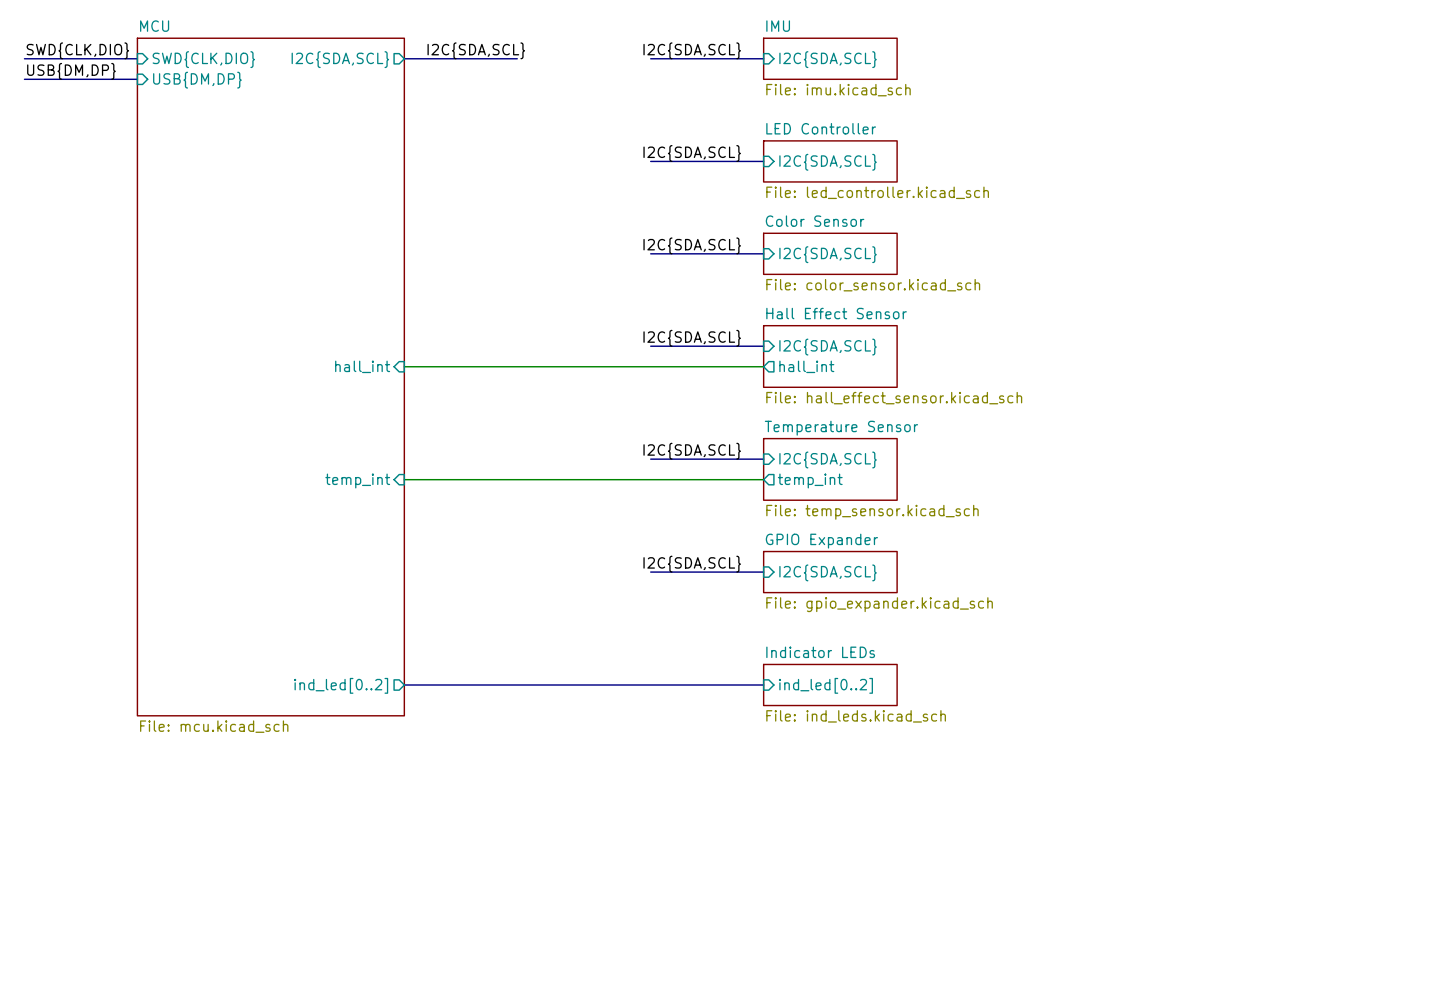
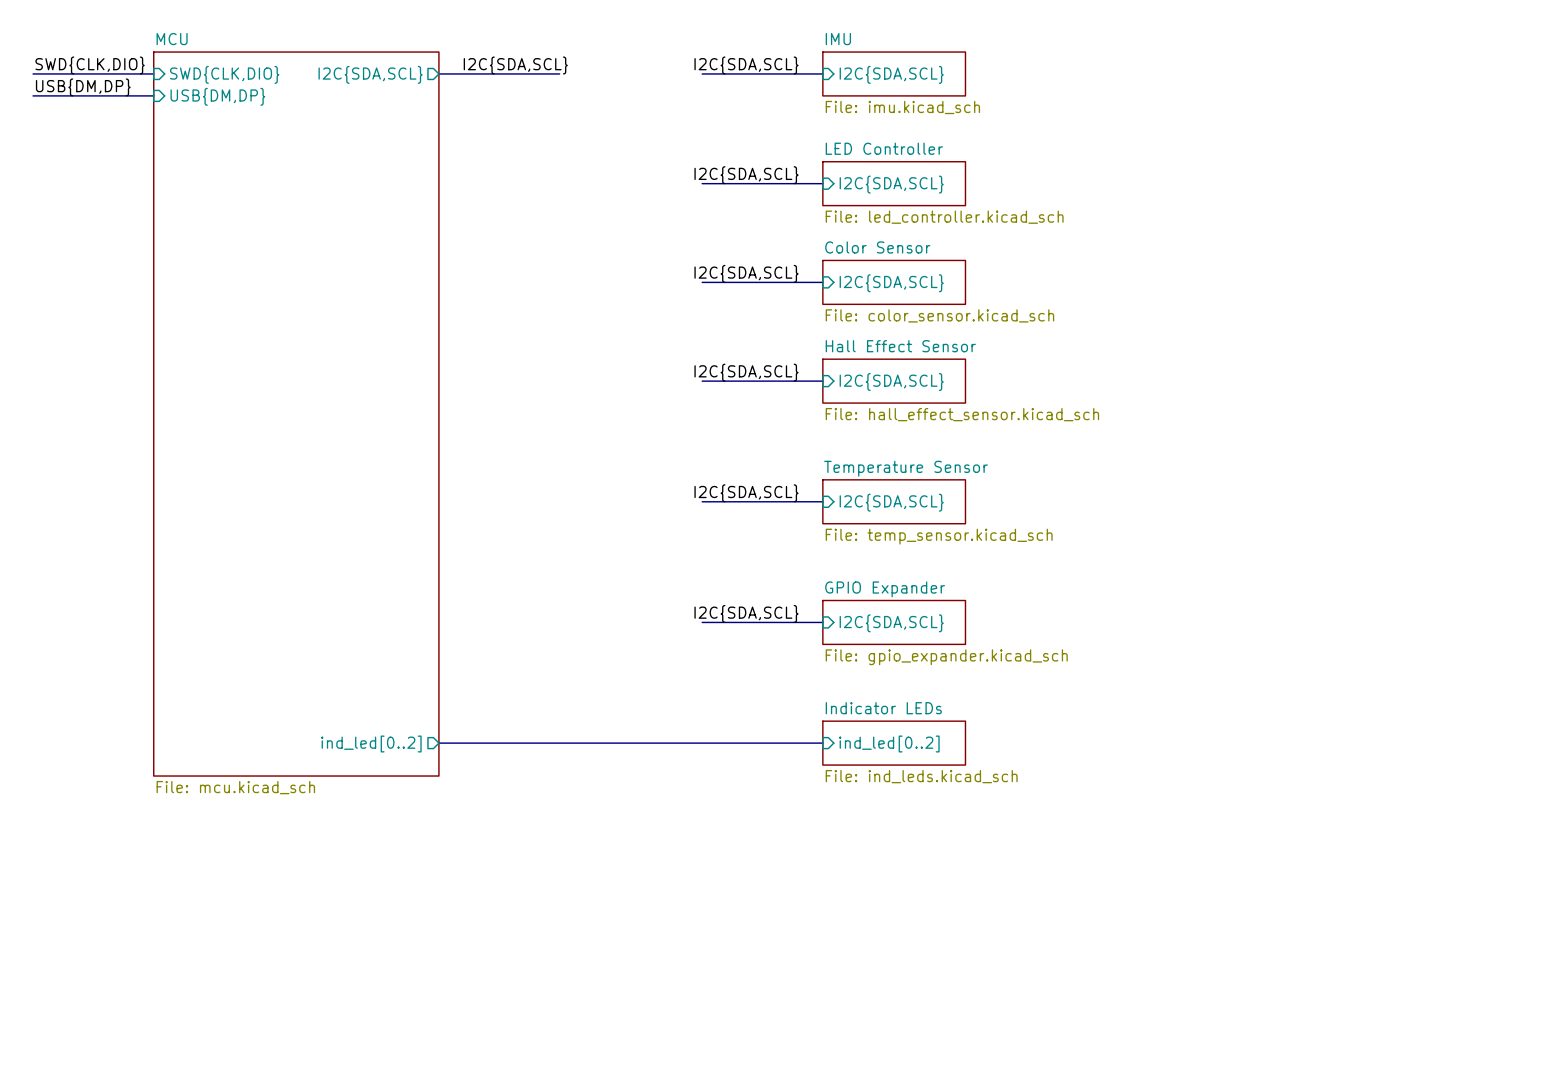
sheet Hall Effect Sensor: none -> File: hall_effect_sensor.kicad_sch (894, 381)
sheet Hall Effect Sensor: File: hall_effect_sensor.kicad_sch (830, 356) -> none
sheet pin: hall_int (362, 366) -> none
wire: (404, 366) (763, 366) -> none
sheet pin: hall_int (806, 366) -> none
sheet Temperature Sensor: none -> File: temp_sensor.kicad_sch (894, 501)
sheet Temperature Sensor: File: temp_sensor.kicad_sch (830, 469) -> none
wire: (404, 479) (763, 479) -> none
sheet pin: temp_int (357, 481) -> none
sheet pin: temp_int (810, 481) -> none

